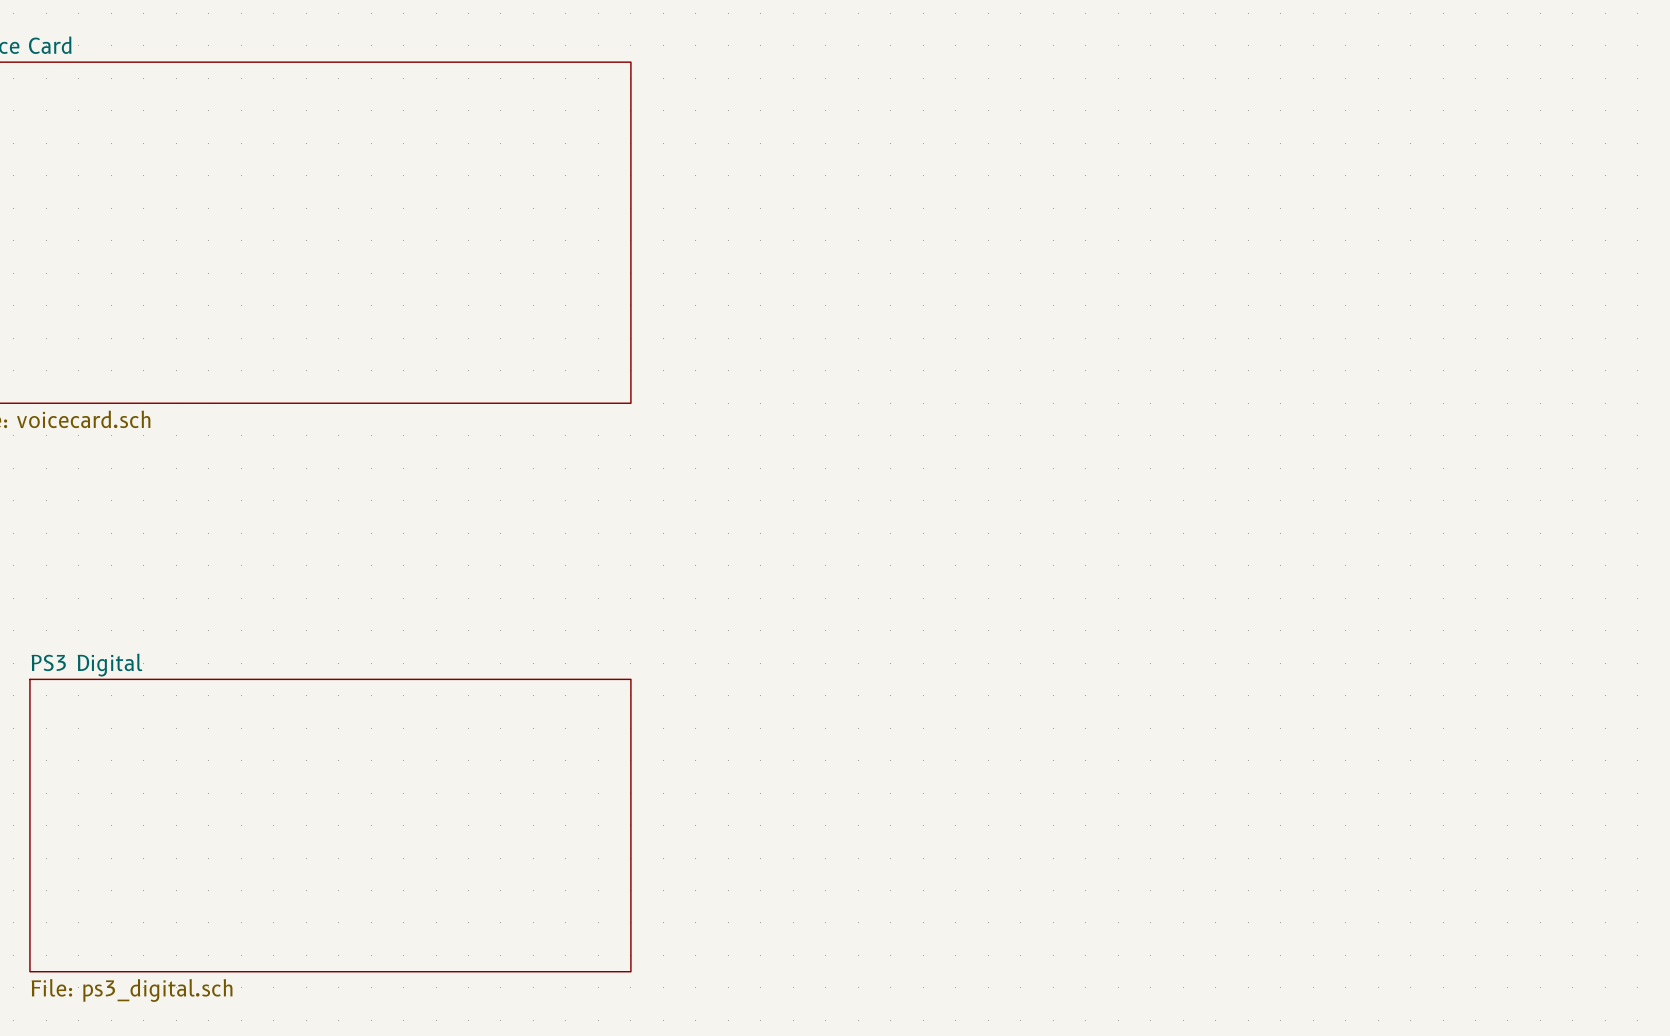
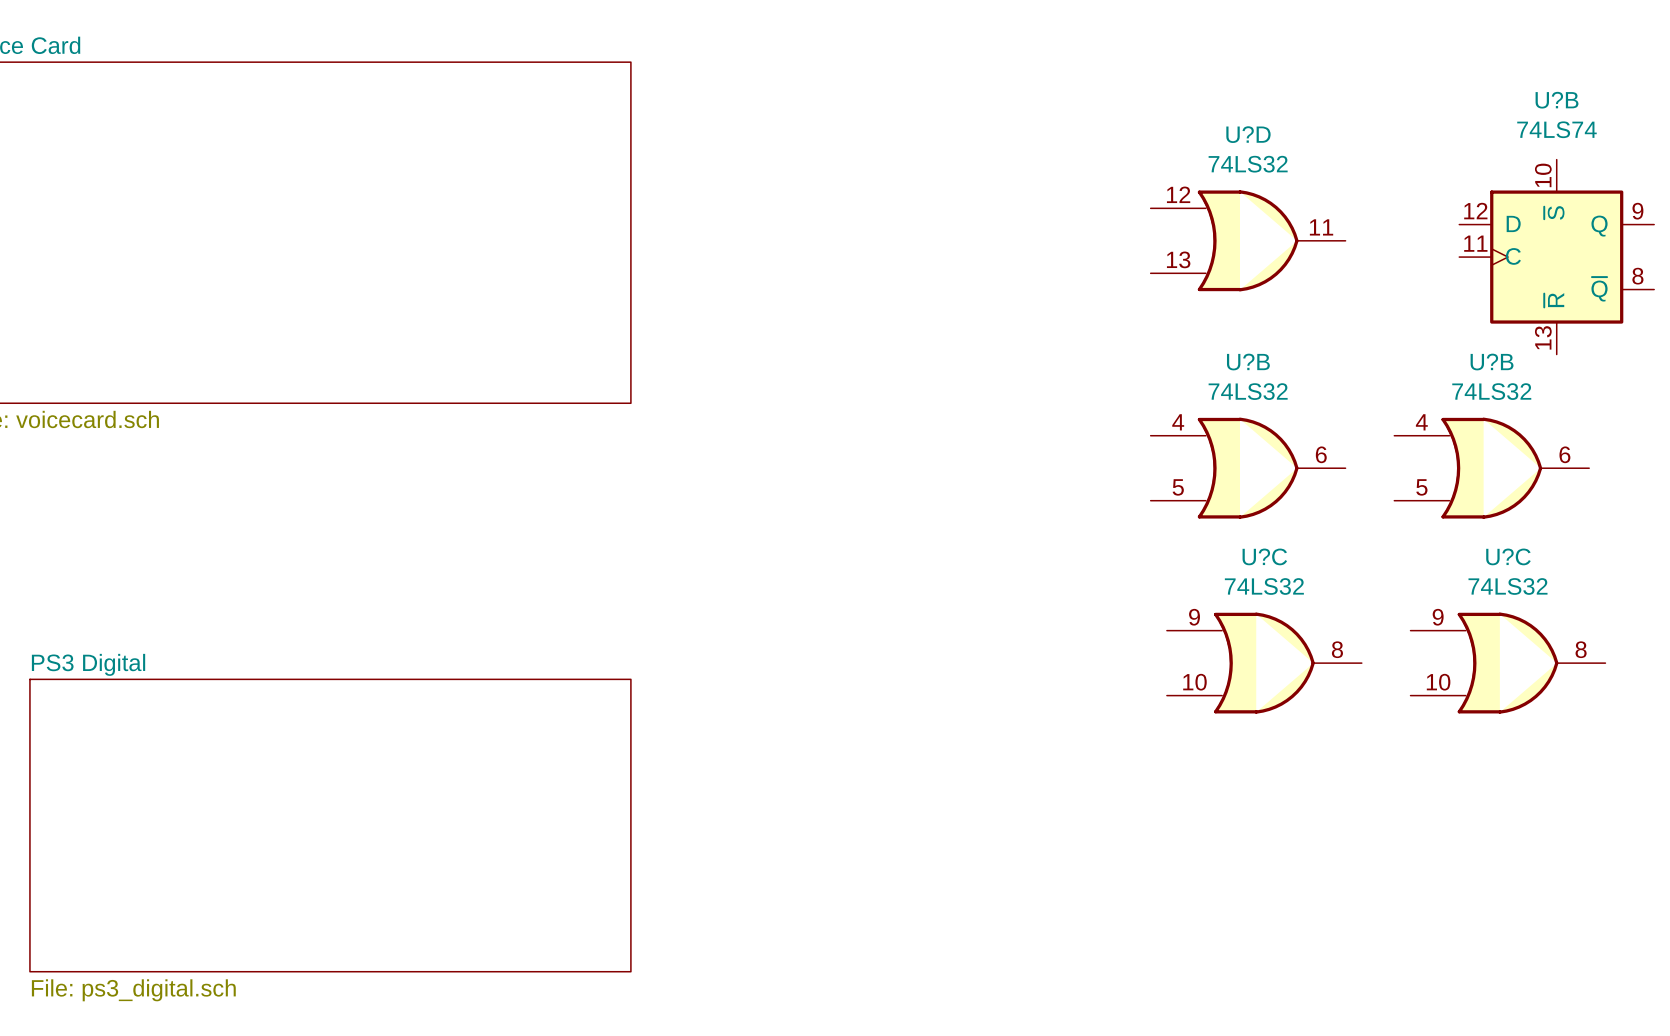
U?D: none -> 74LS32 (1248, 240)
U?B: none -> 74LS74 (1556, 257)
U?B: none -> 74LS32 (1248, 468)
U?B: none -> 74LS32 (1491, 468)
U?C: none -> 74LS32 (1264, 663)
U?C: none -> 74LS32 (1507, 663)

